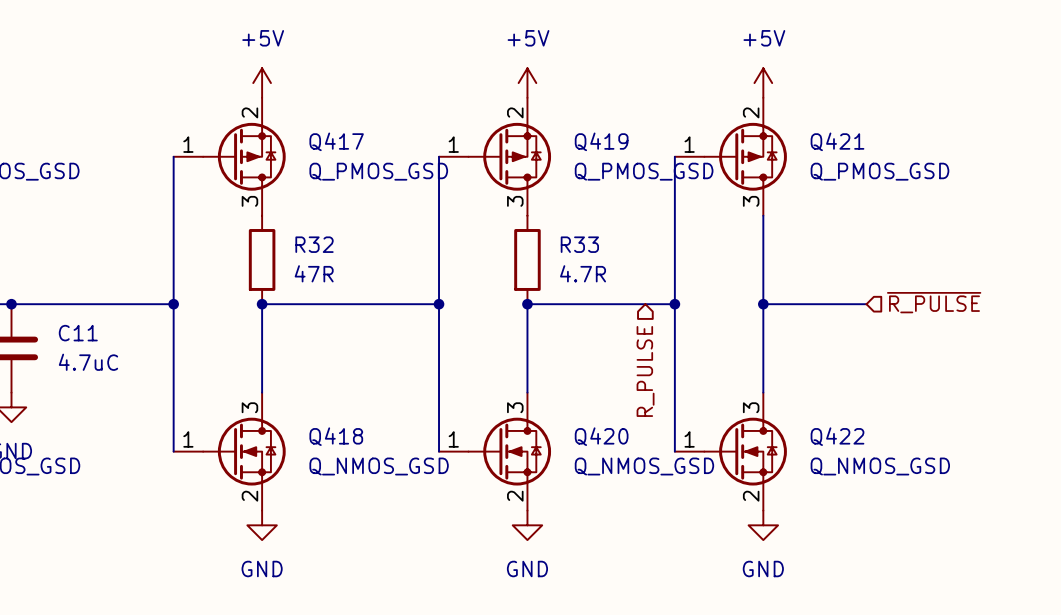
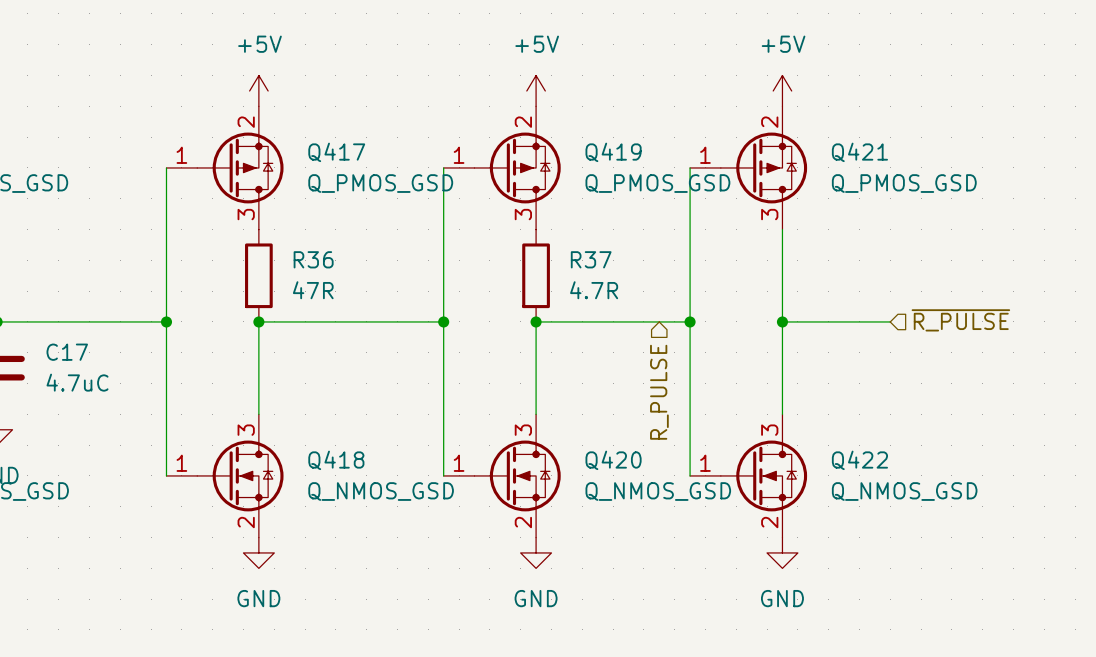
R32 name: R32 (314, 244) -> R36 (313, 259)
R33 name: R33 (579, 244) -> R37 (591, 259)
C11 name: C11 (78, 333) -> C17 (67, 352)

